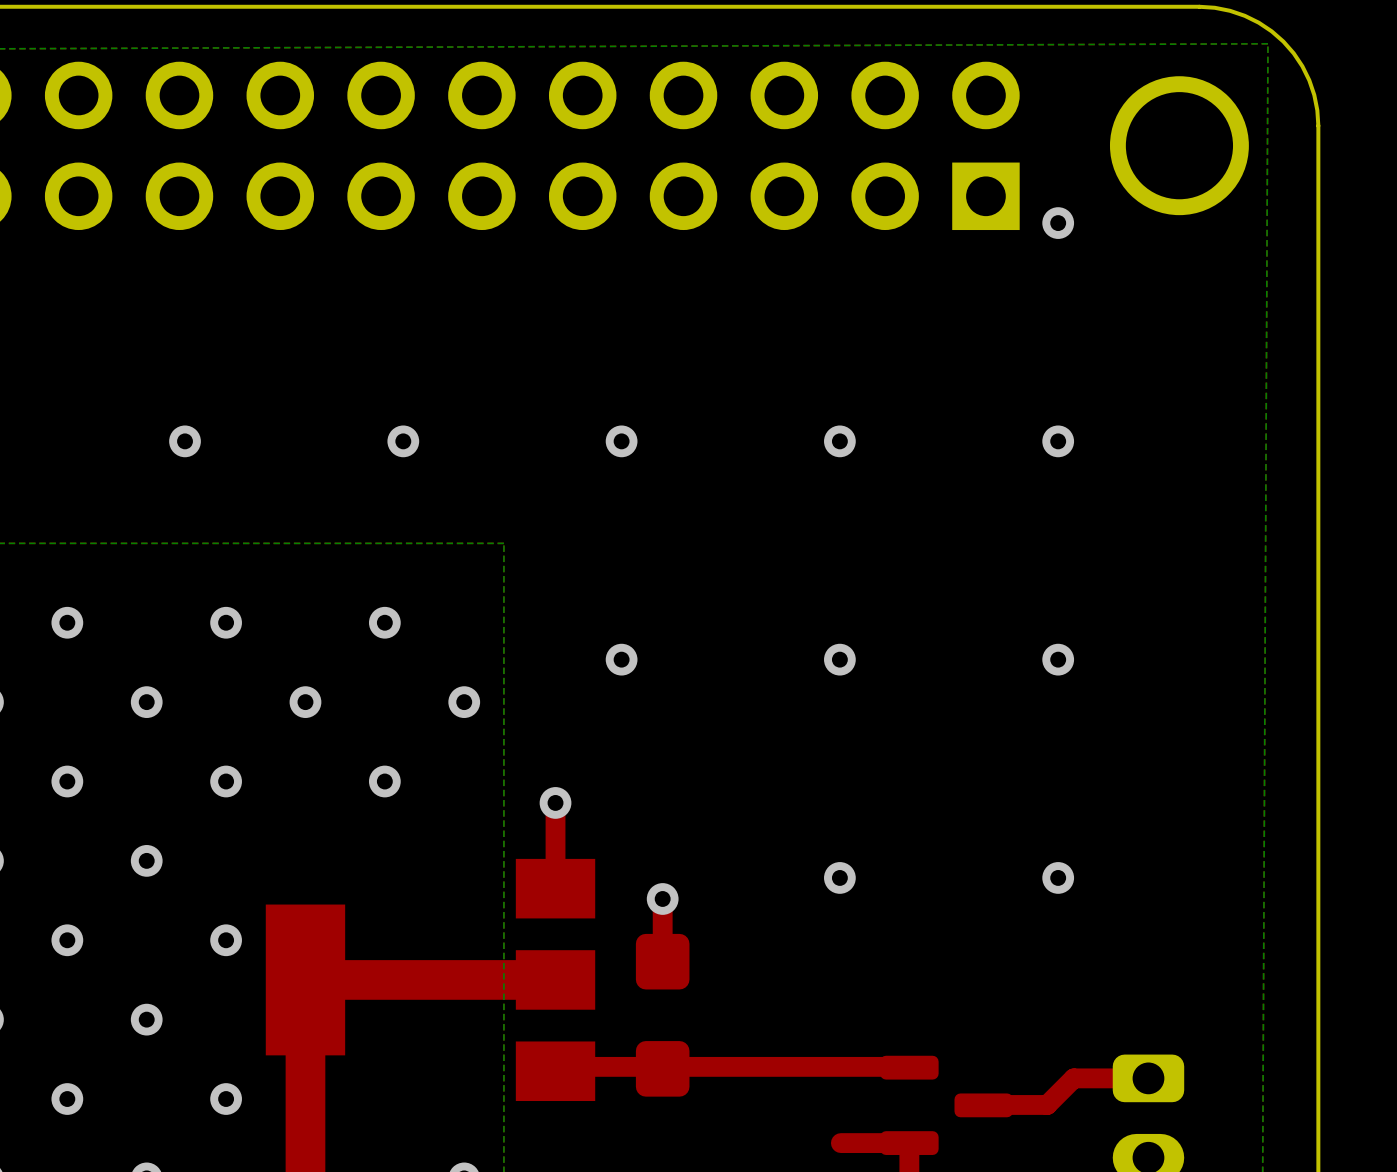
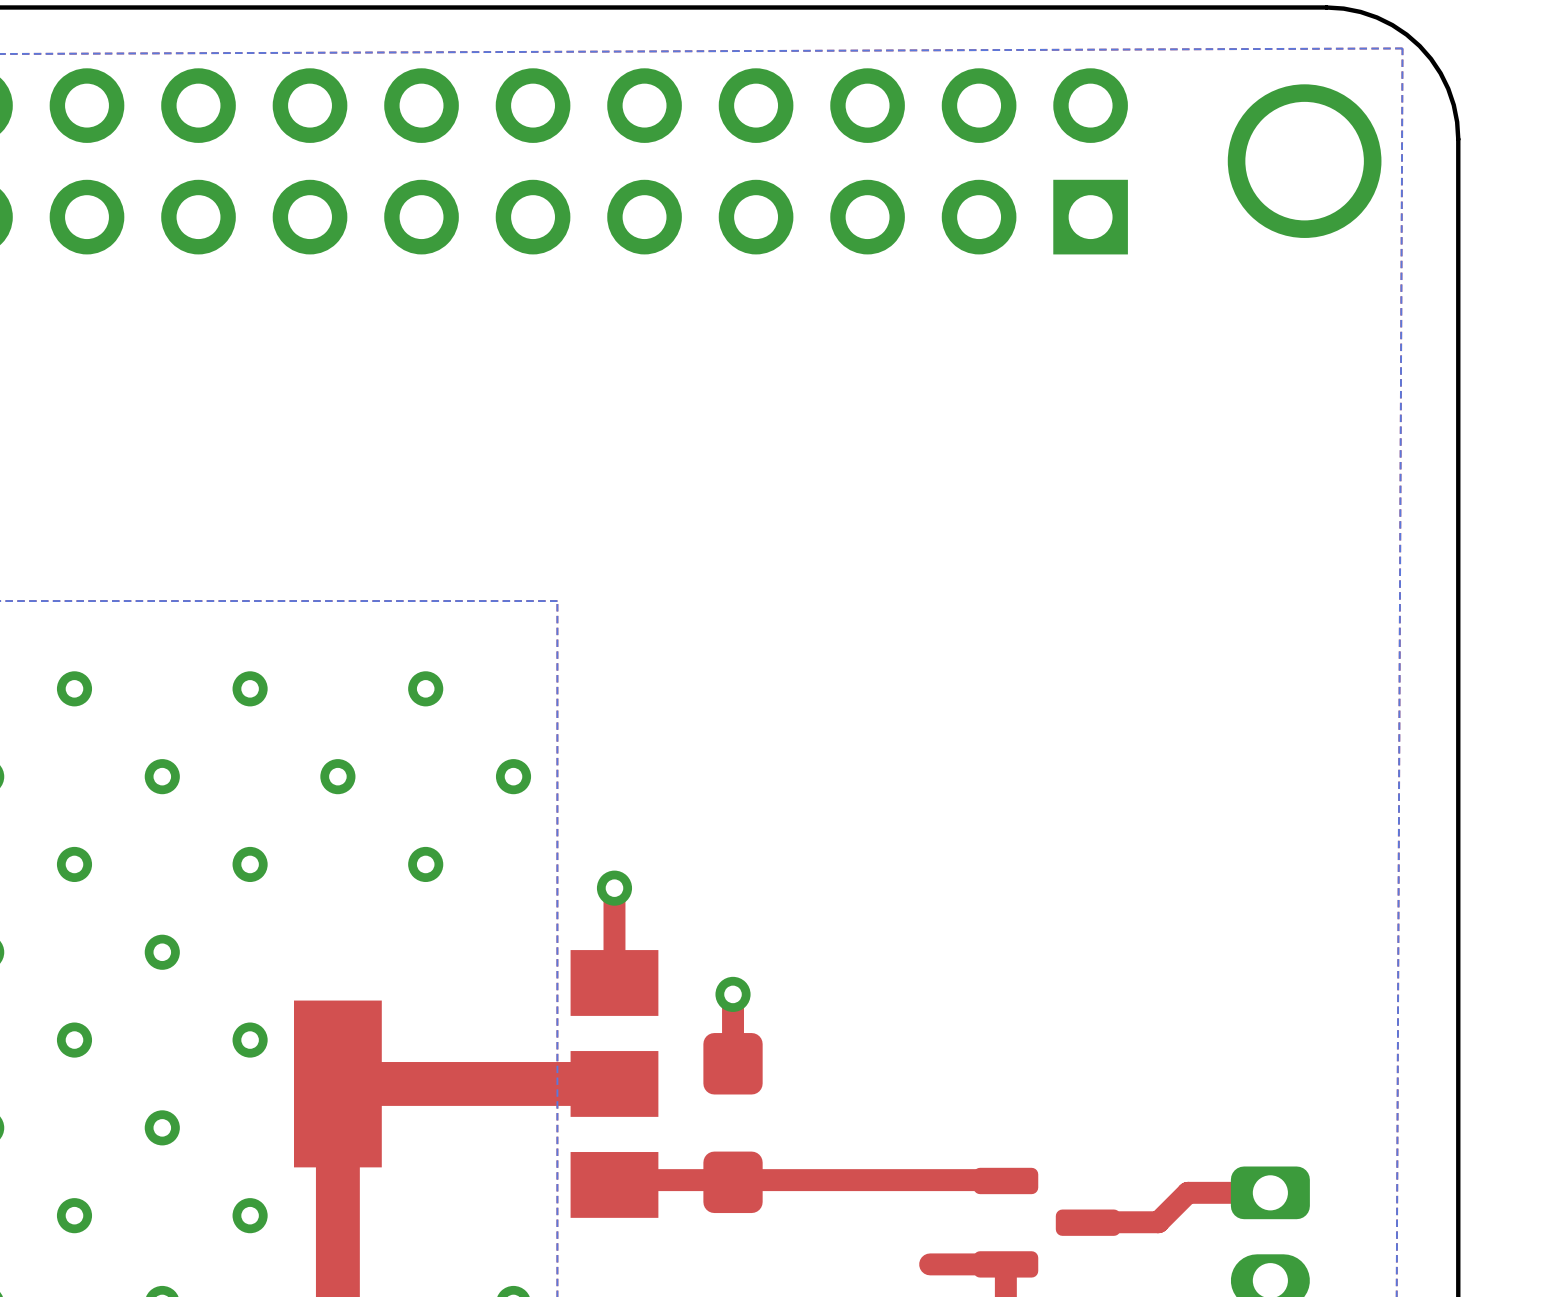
via: (1058, 223) -> none
via: (185, 441) -> none
via: (403, 441) -> none
via: (621, 441) -> none
via: (839, 441) -> none
via: (1058, 441) -> none
via: (621, 659) -> none
via: (839, 659) -> none
via: (1058, 659) -> none
via: (839, 877) -> none
via: (1058, 877) -> none

